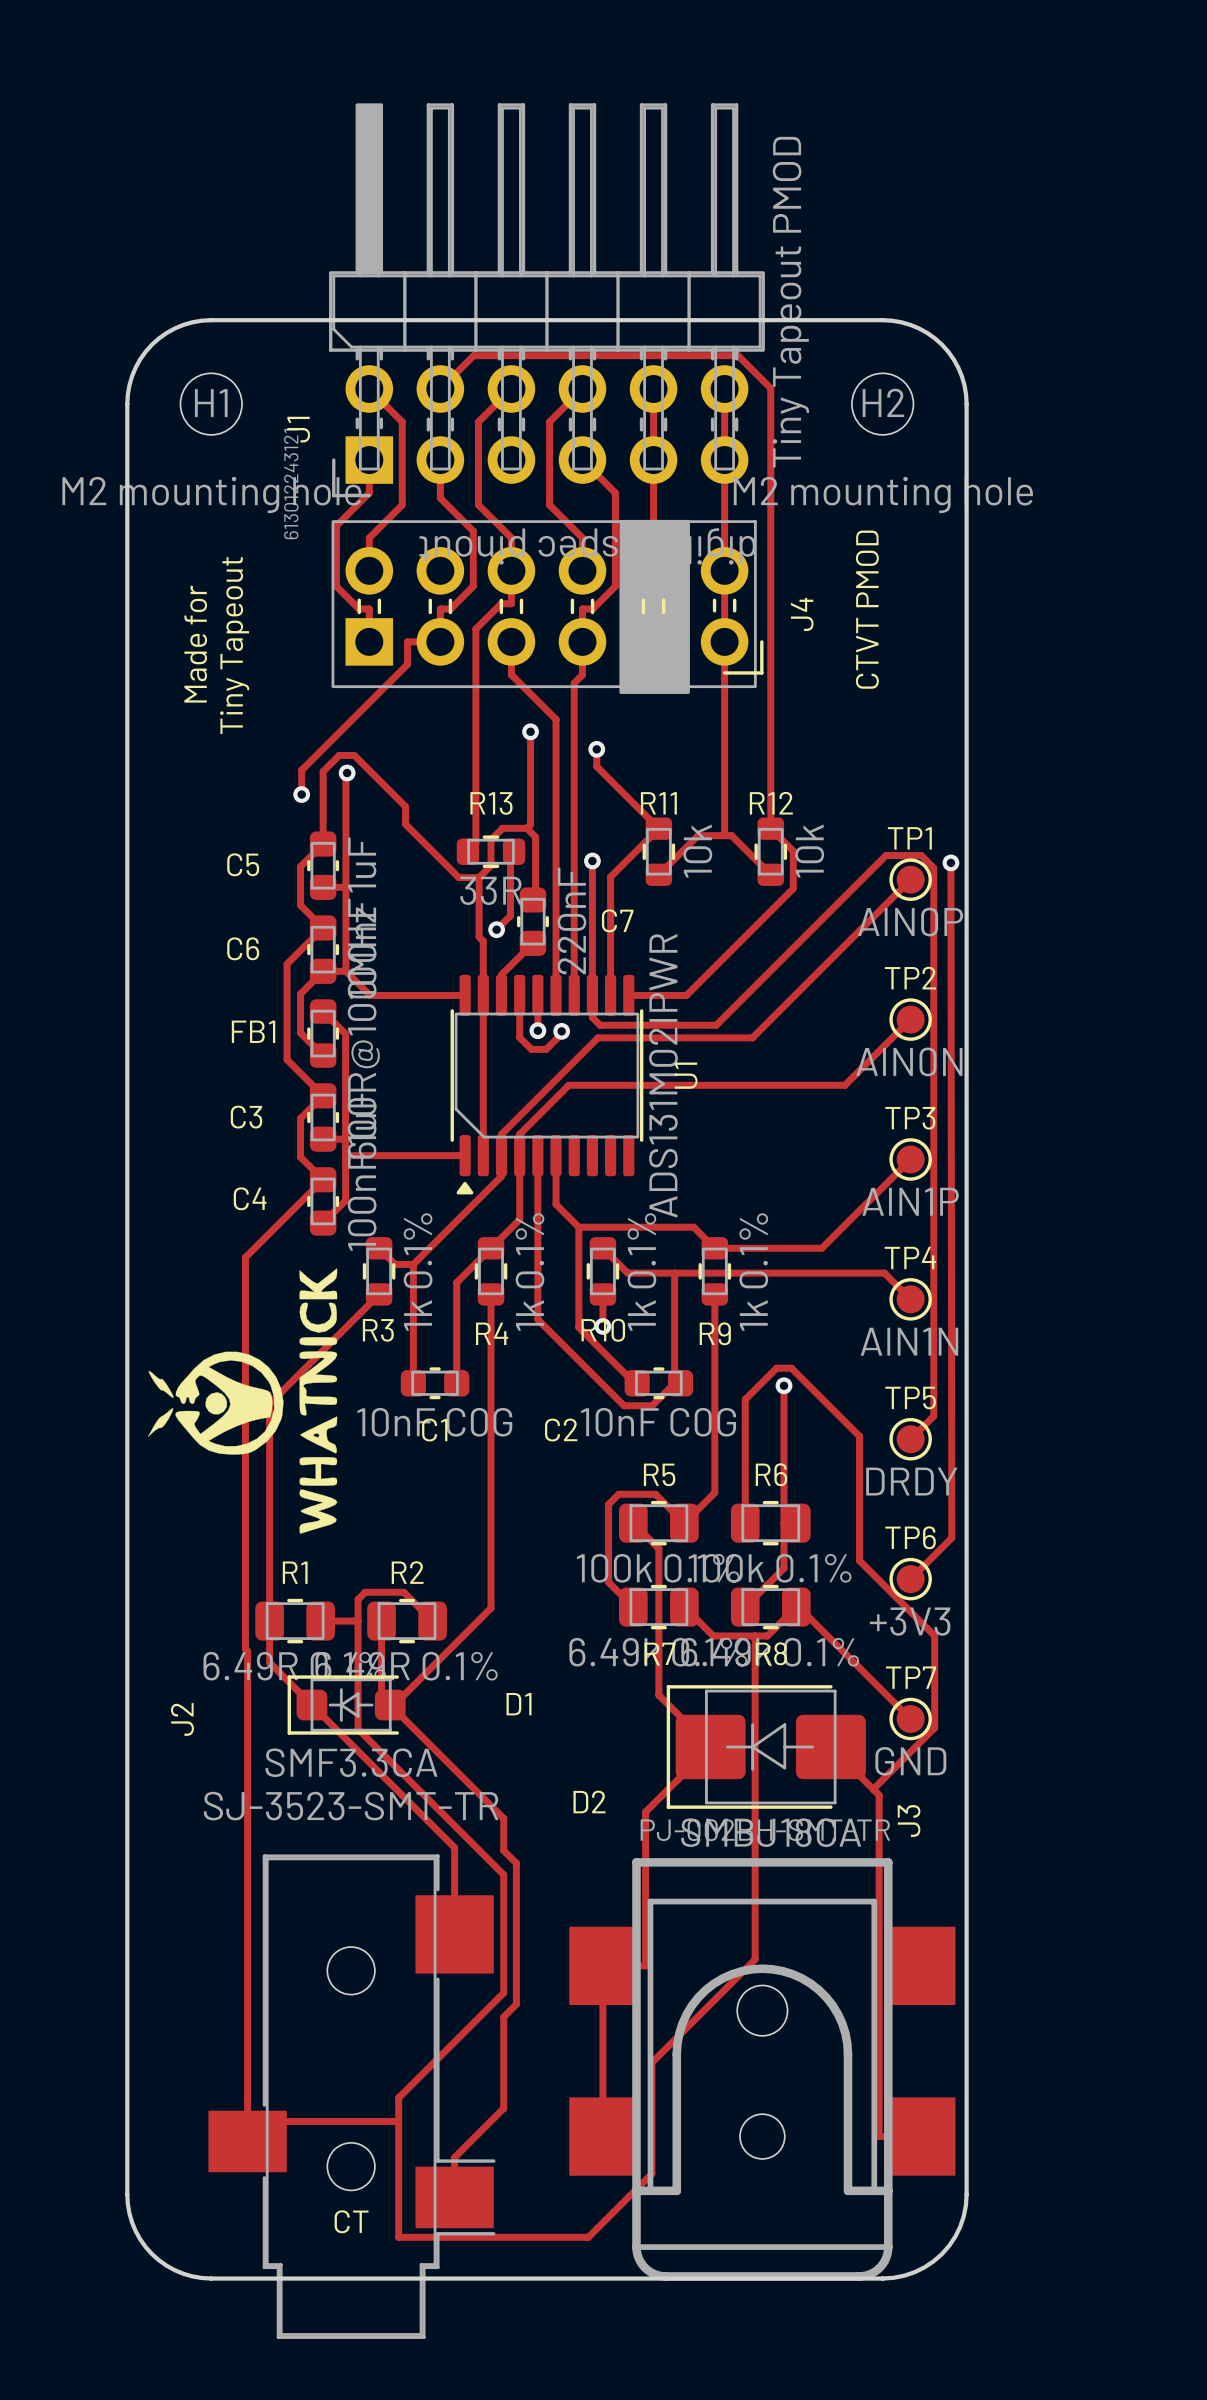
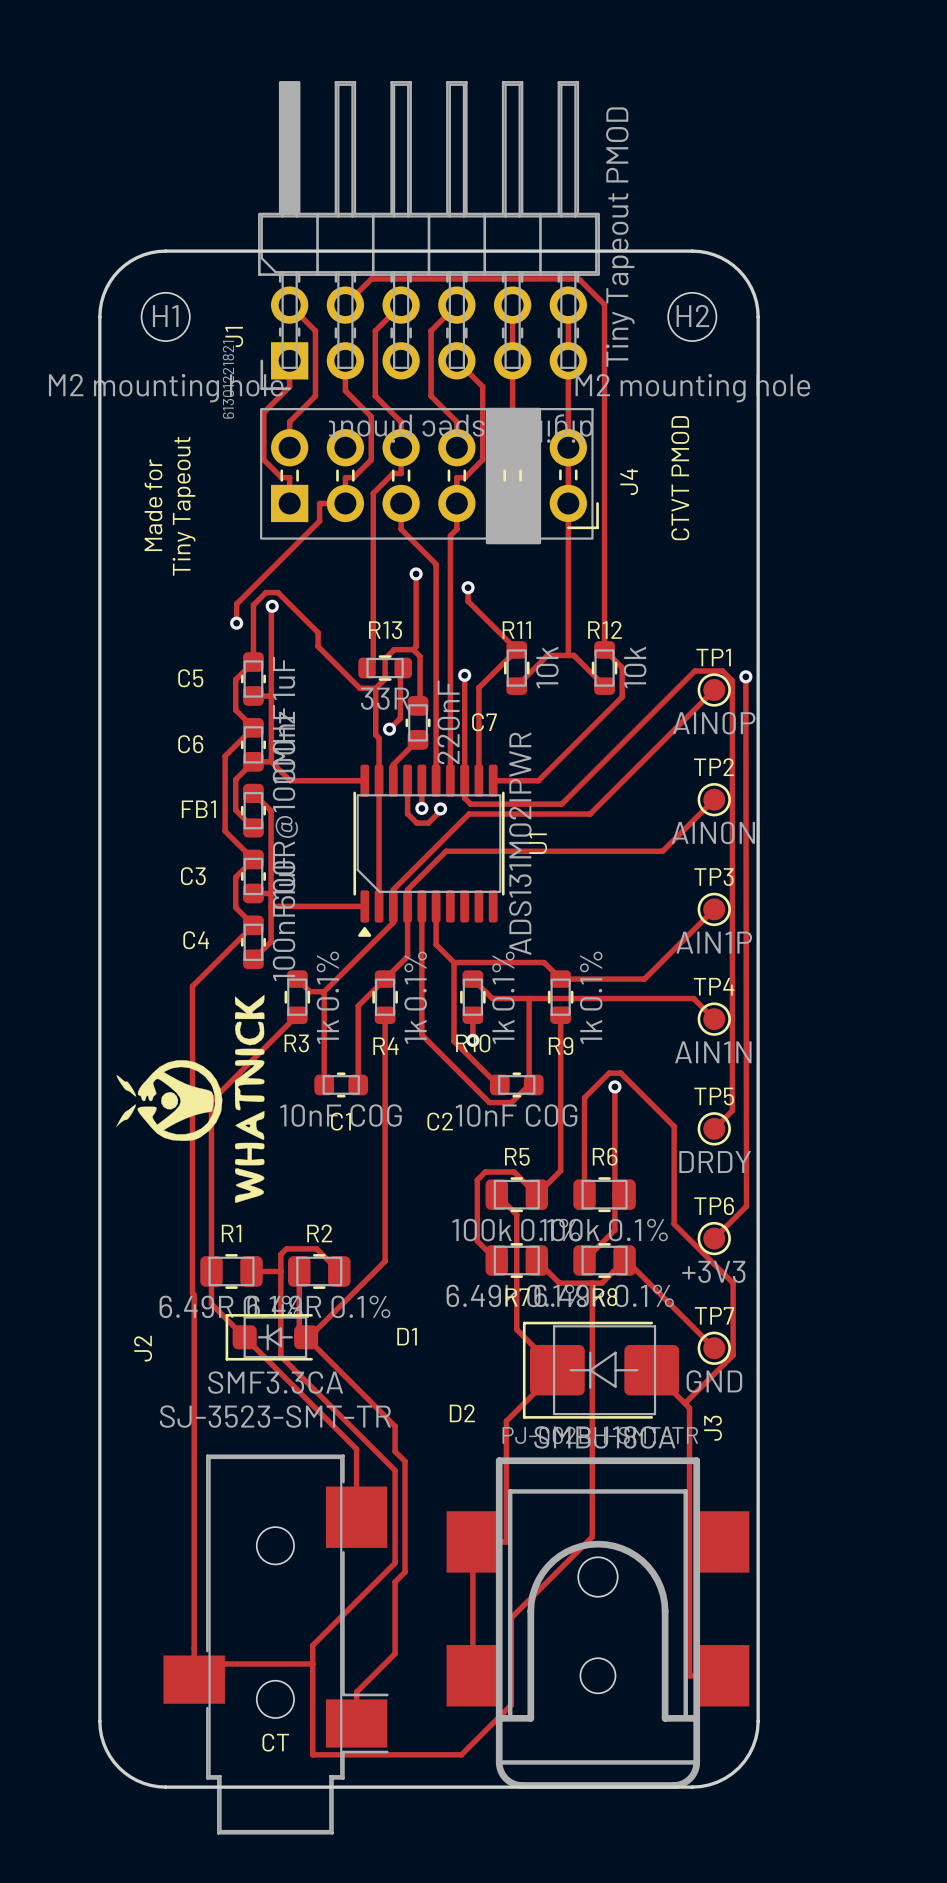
J4 value: 613012243121 (291, 484) -> 61301221821 (228, 379)

